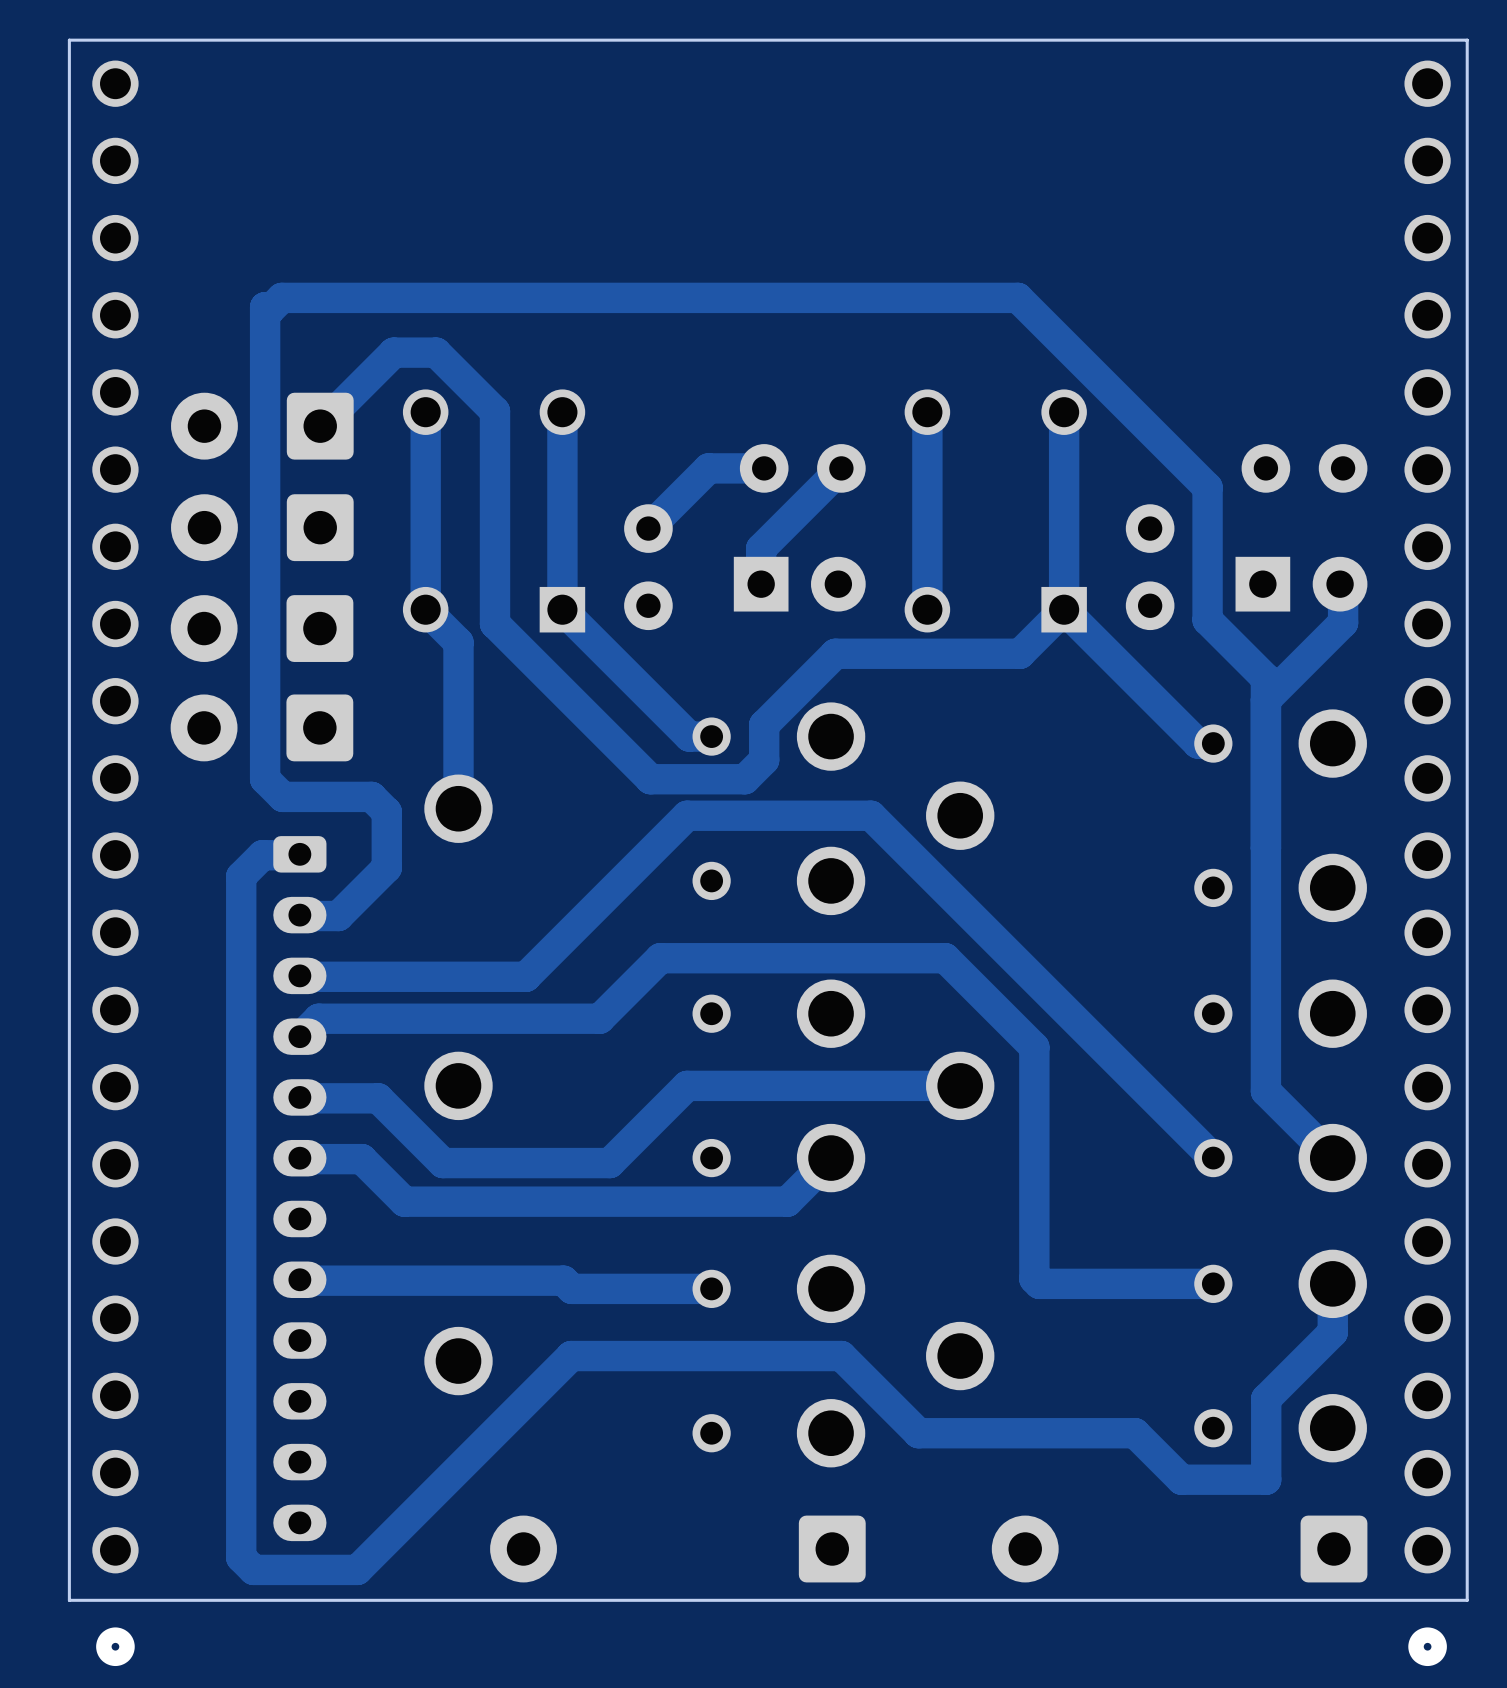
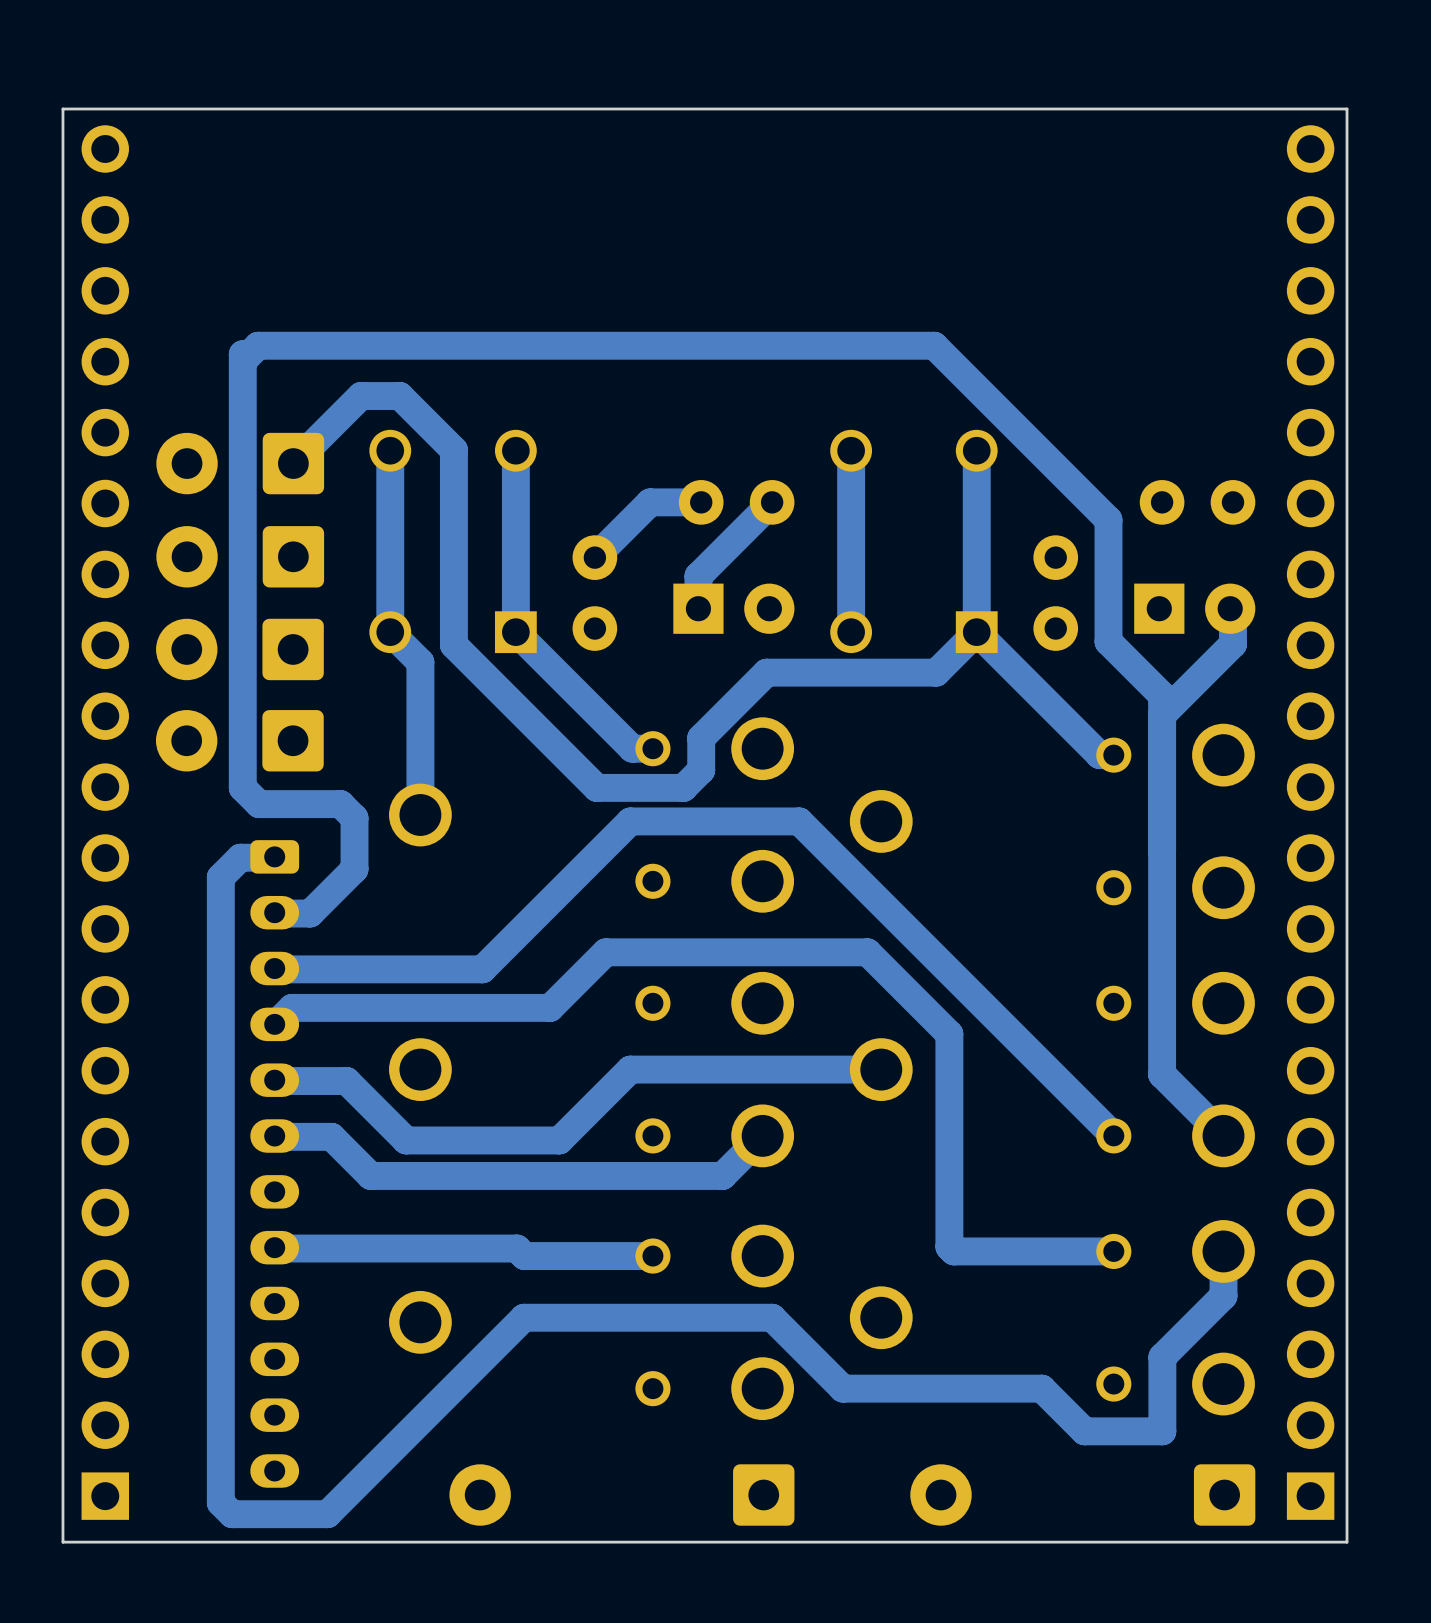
part: none -> (105, 822)
part: none -> (1310, 822)
part: (115, 863) -> none
part: (1427, 863) -> none

